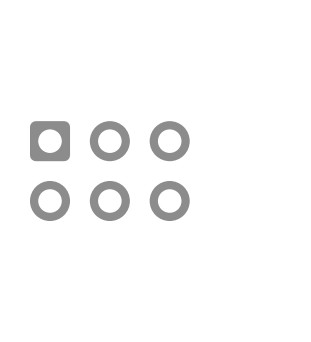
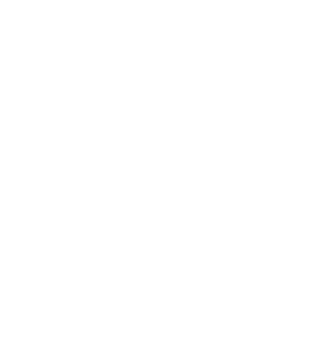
part: (109, 171) -> none

